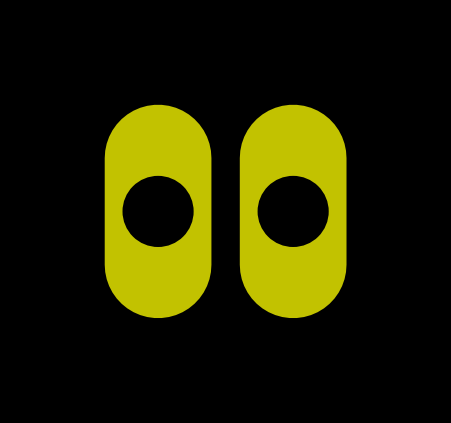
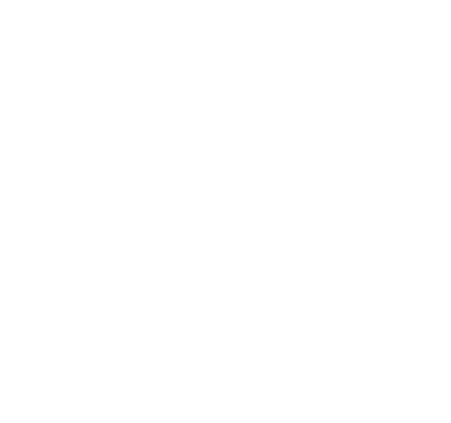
part: (225, 211) -> none

